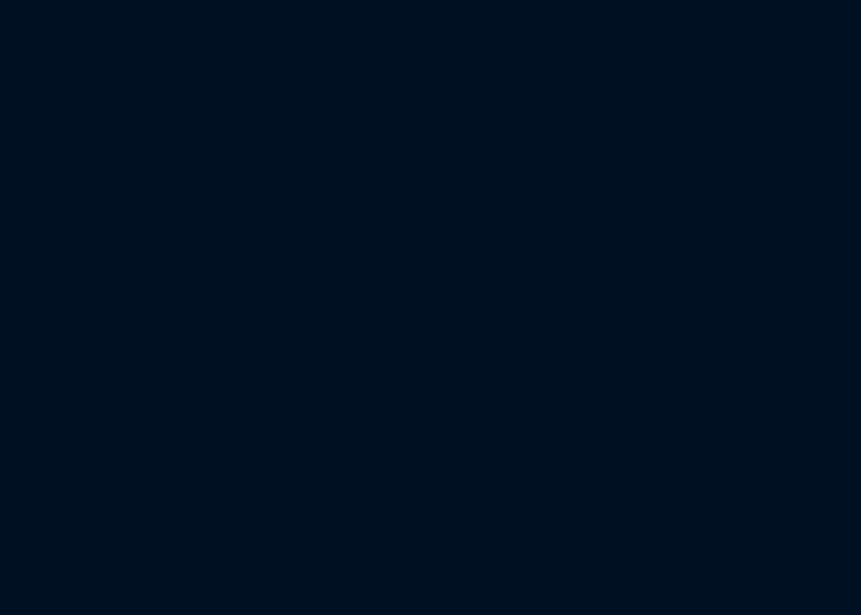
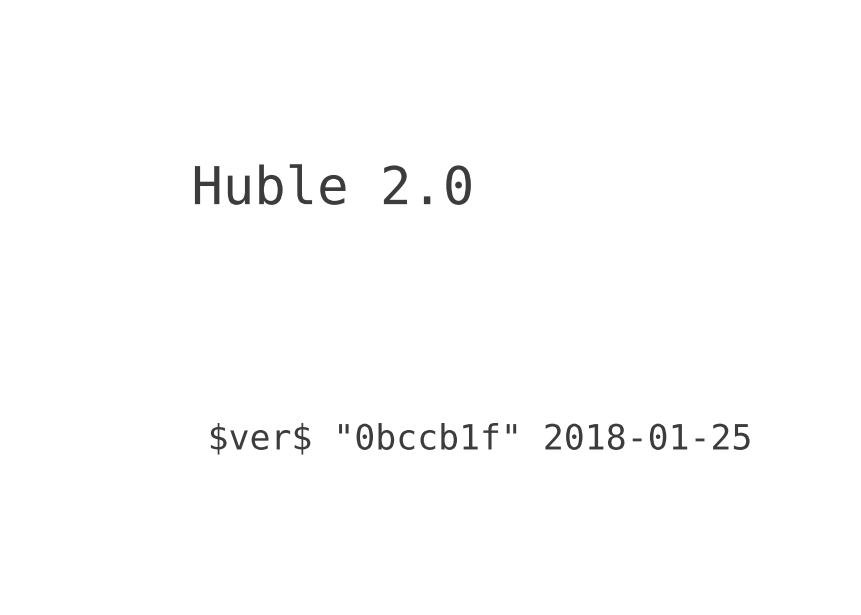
text: none -> Huble 2.0 (332, 184)
text: none -> $ver$ "0bccb1f" 2018-01-25 (480, 438)

